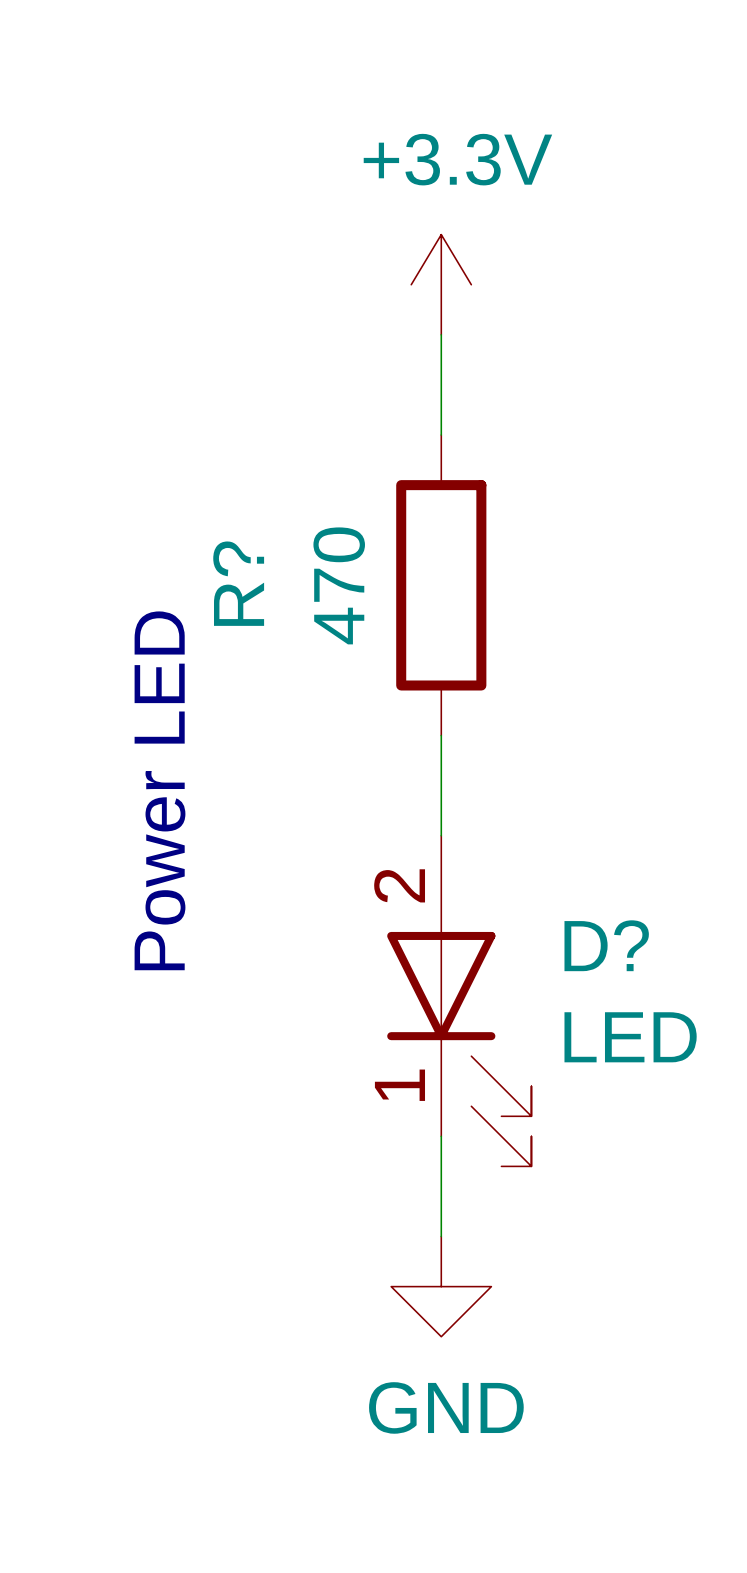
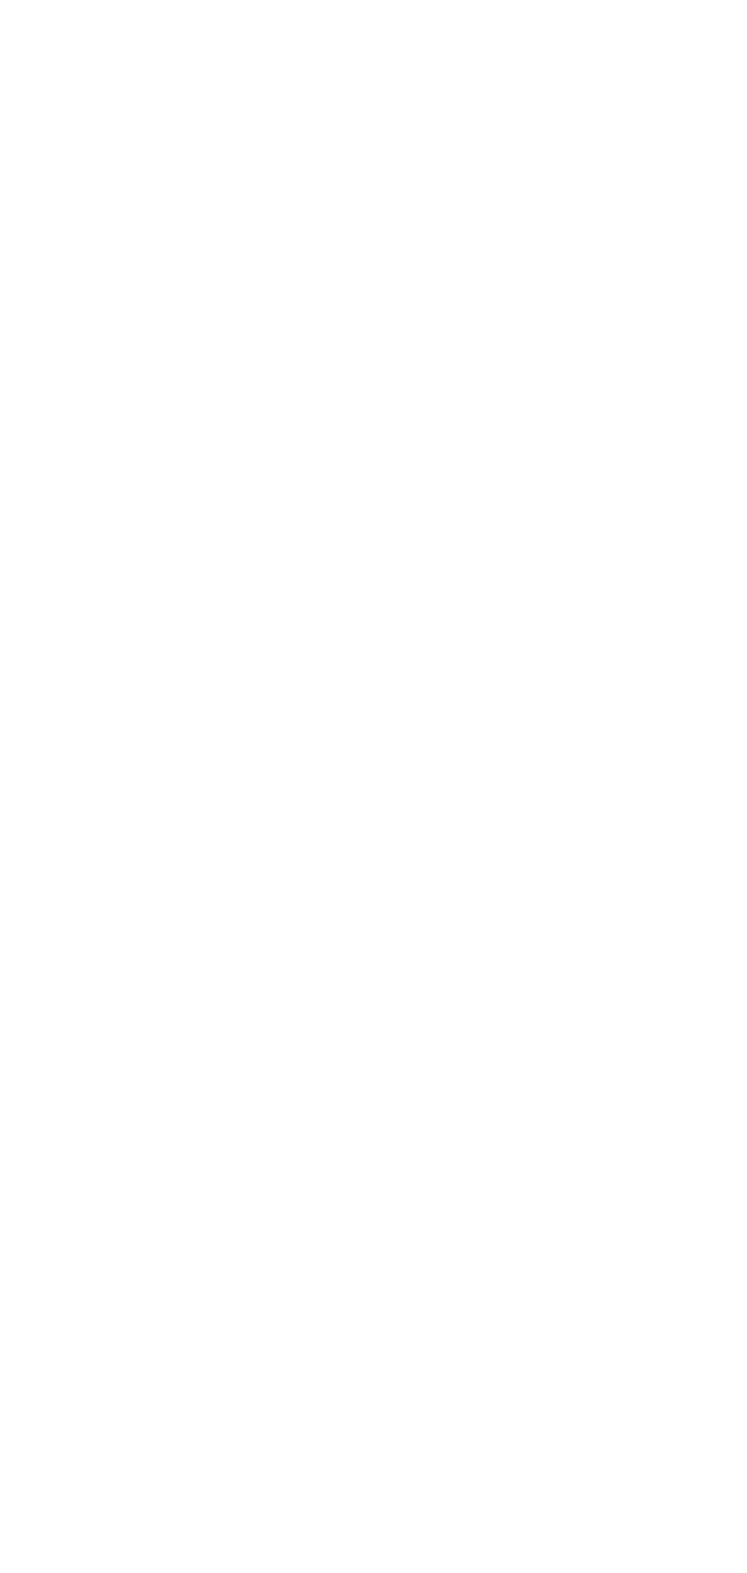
power symbol: +3.3V (441, 284) -> none
wire: (441, 334) (441, 435) -> none
R?: 470 (441, 585) -> none
wire: (441, 735) (441, 835) -> none
text: Power LED (160, 790) -> none
D?: LED (459, 1001) -> none
wire: (441, 1136) (441, 1236) -> none
power symbol: GND (441, 1286) -> none

